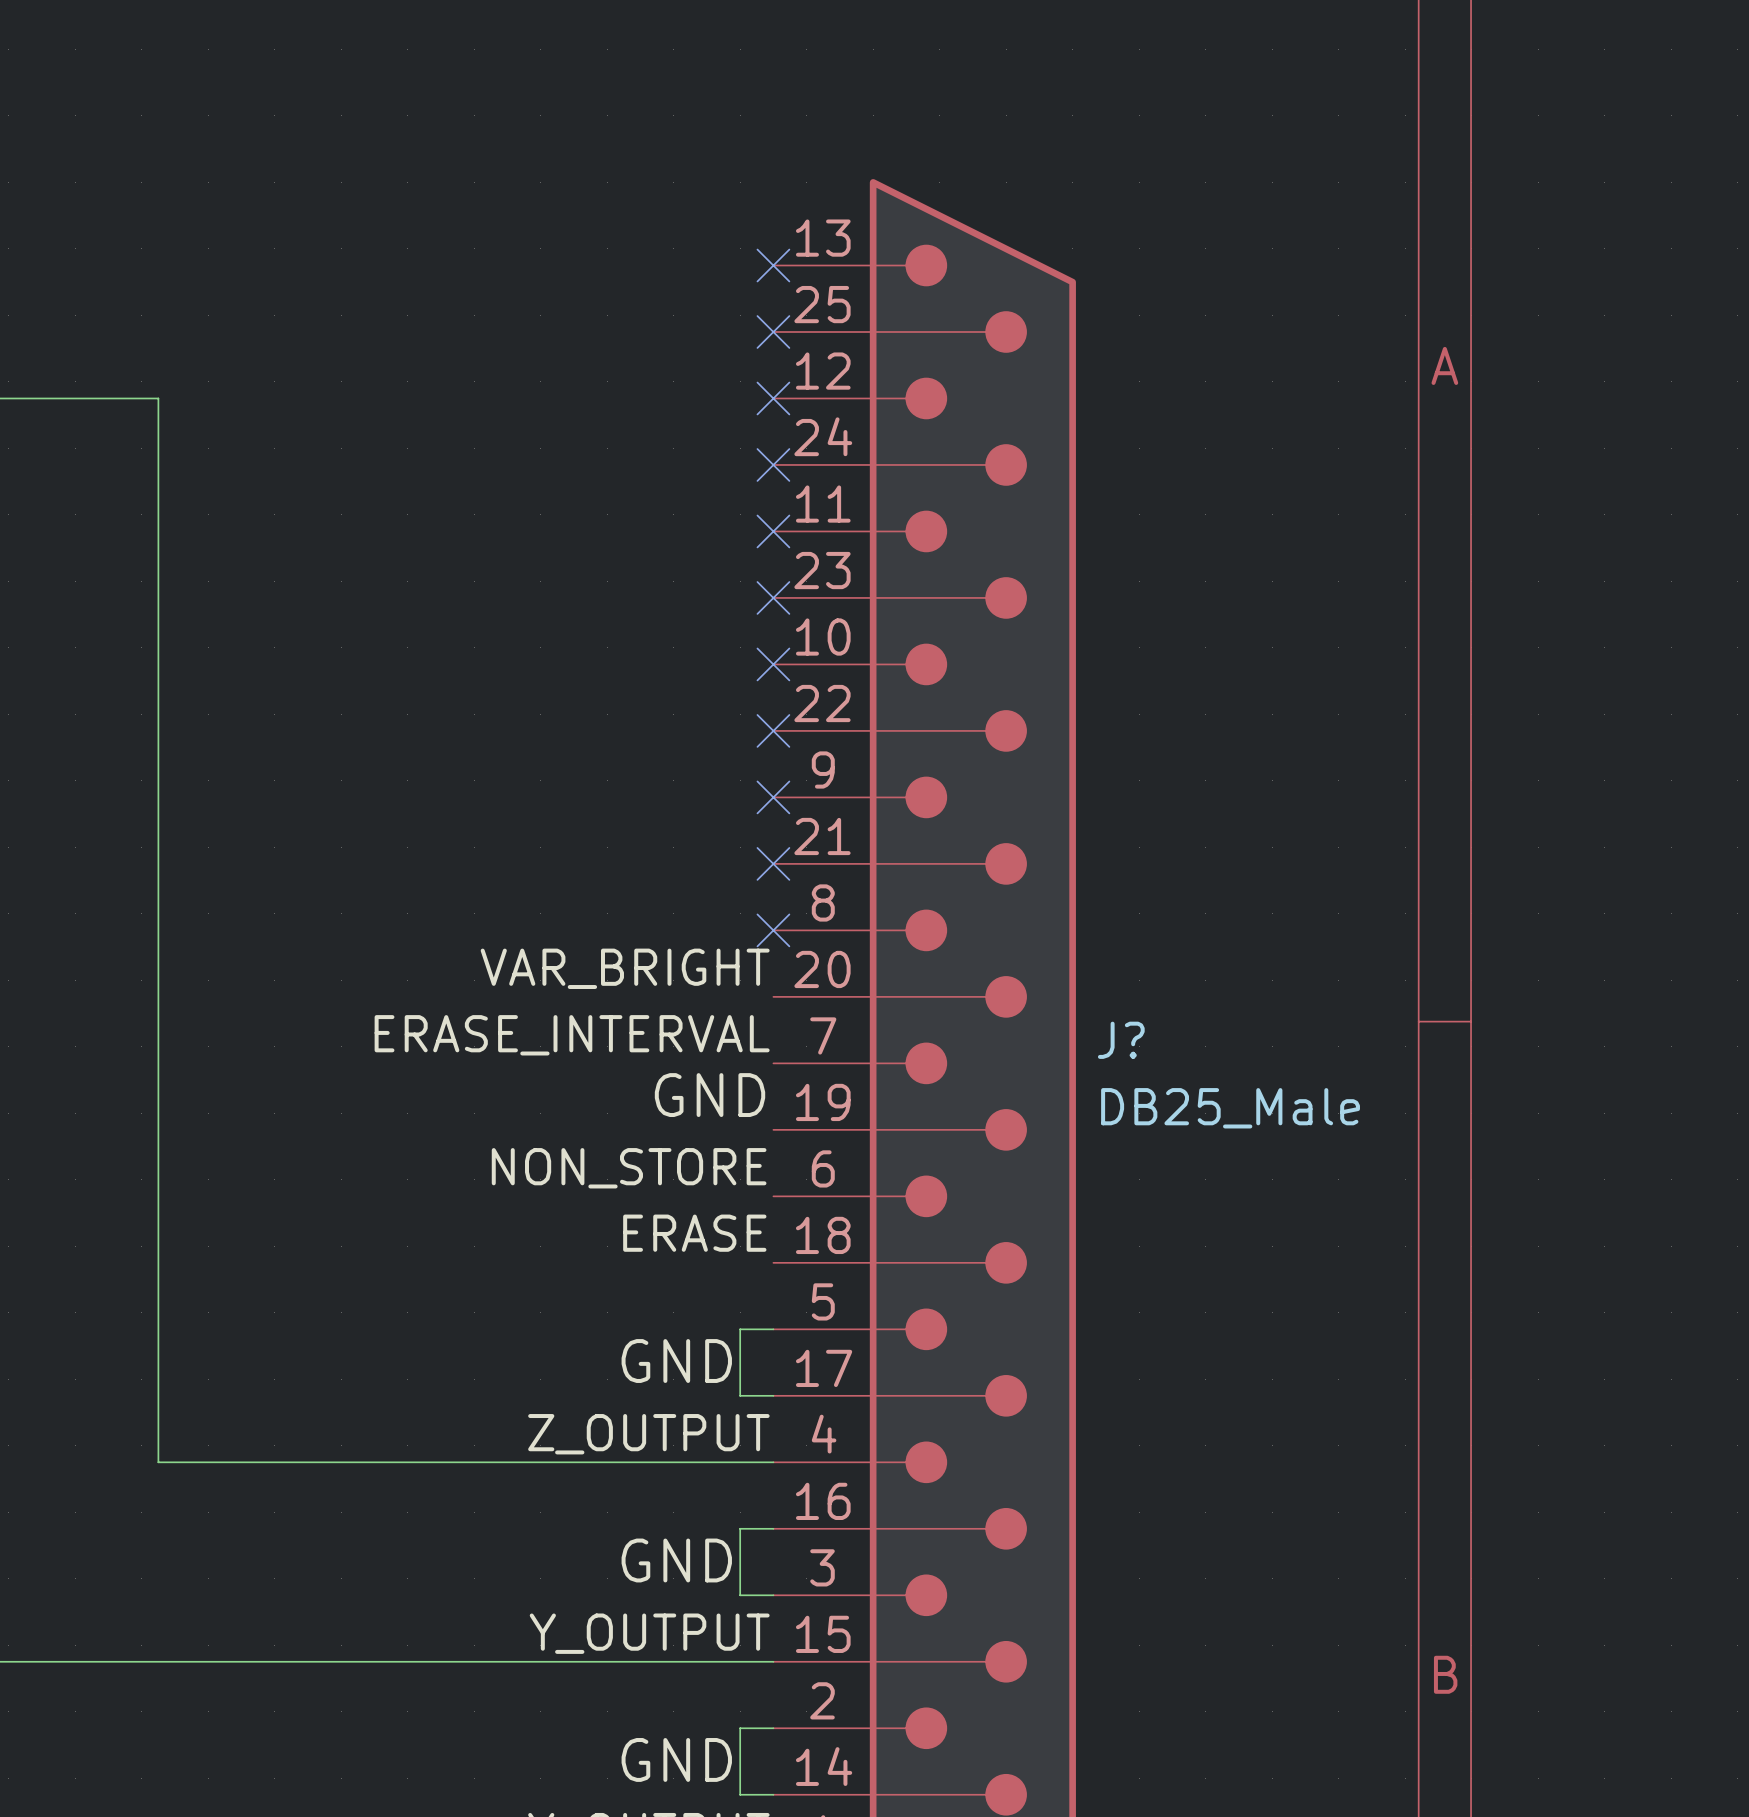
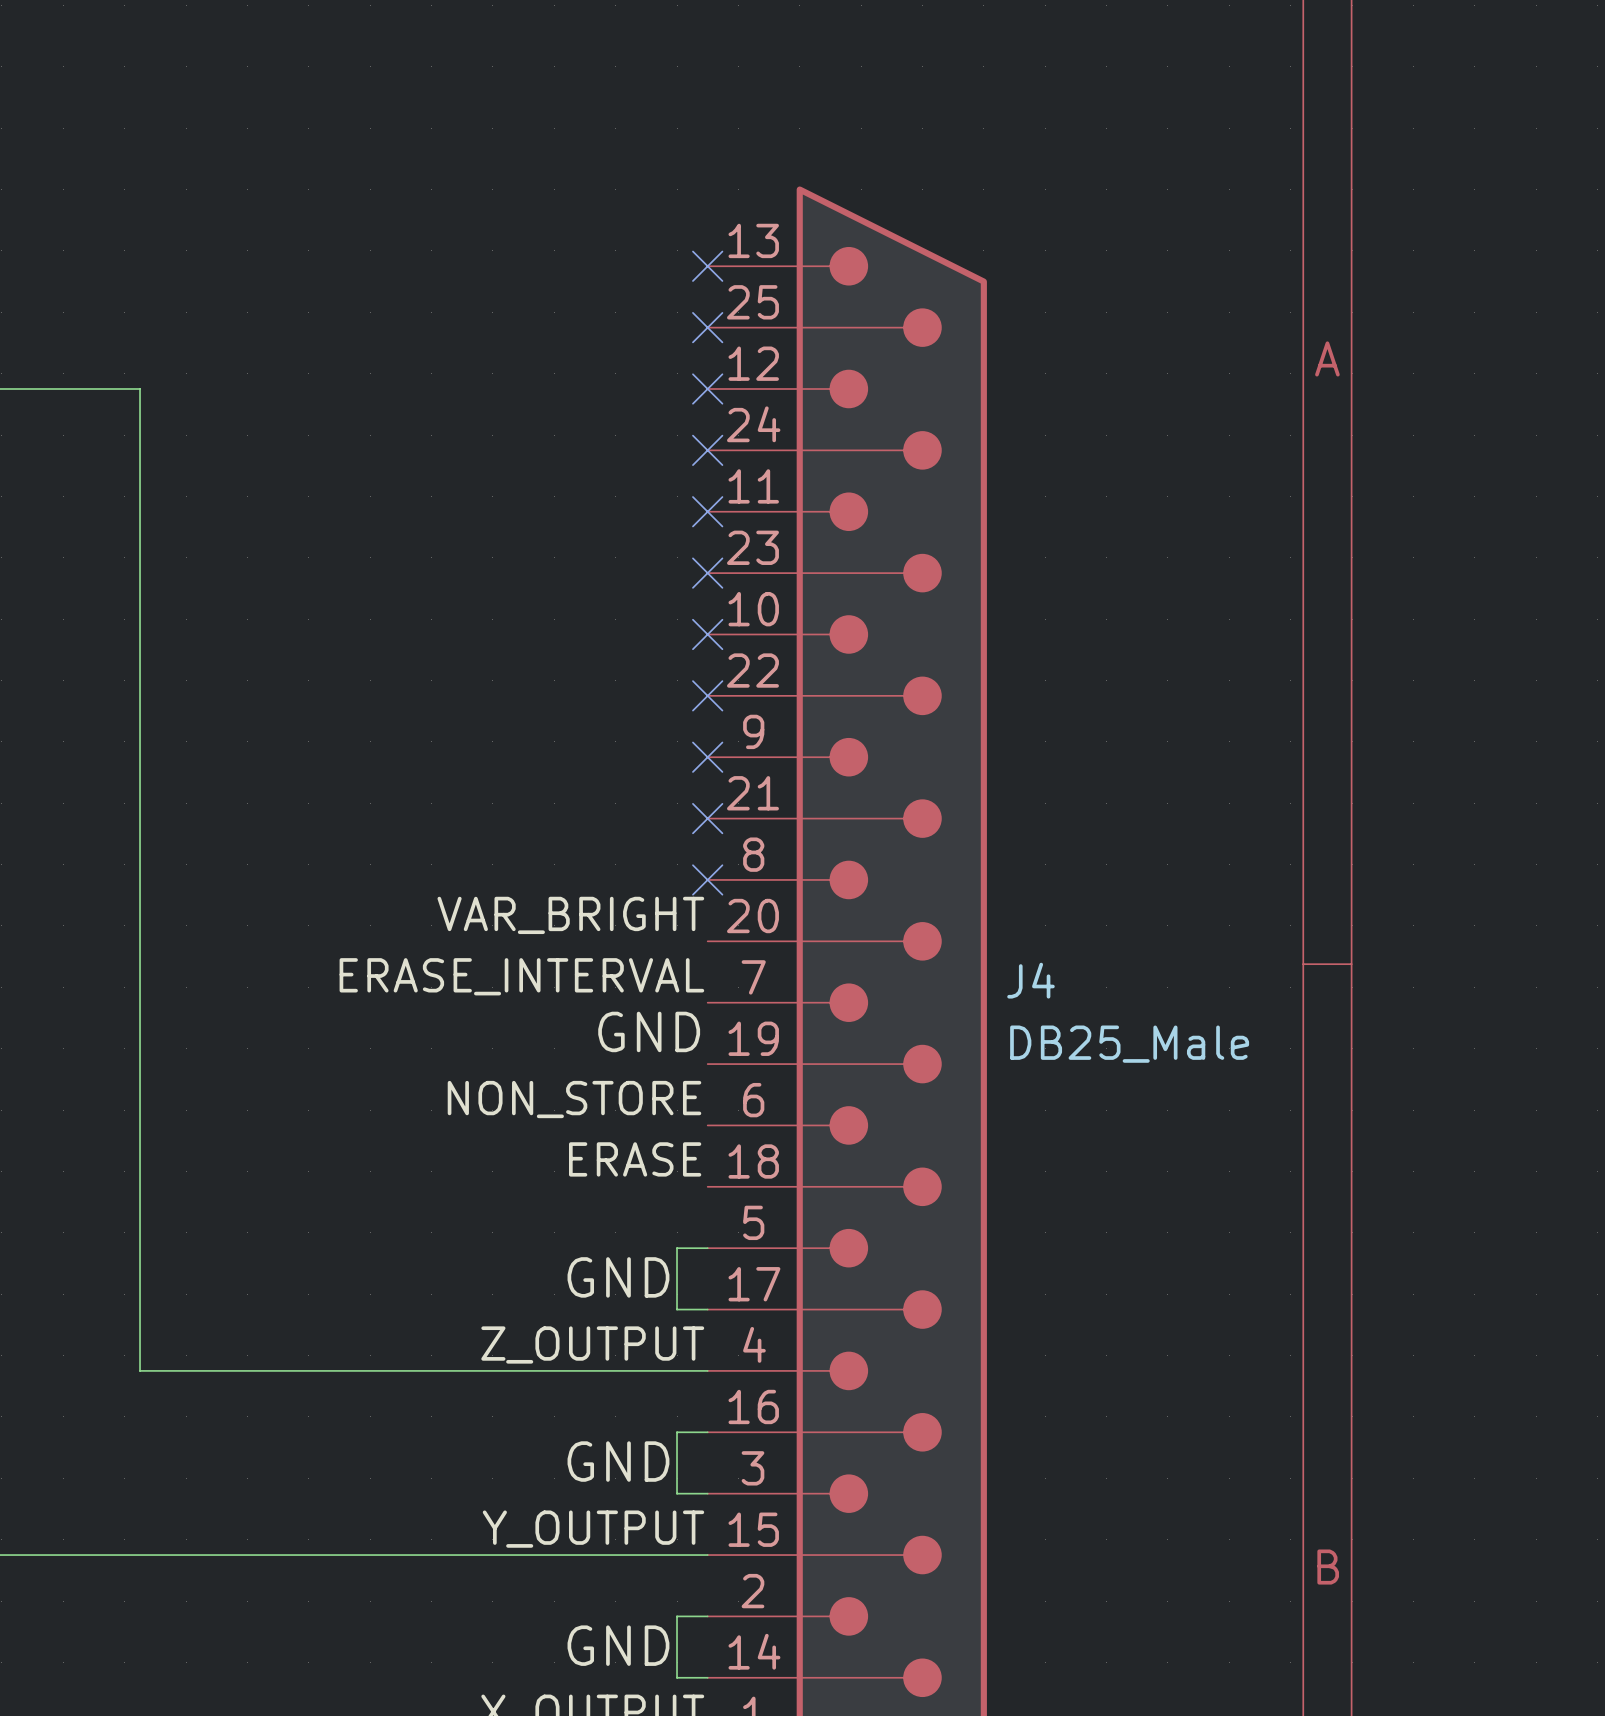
J? name: J? (1121, 1040) -> J4 (1030, 980)

